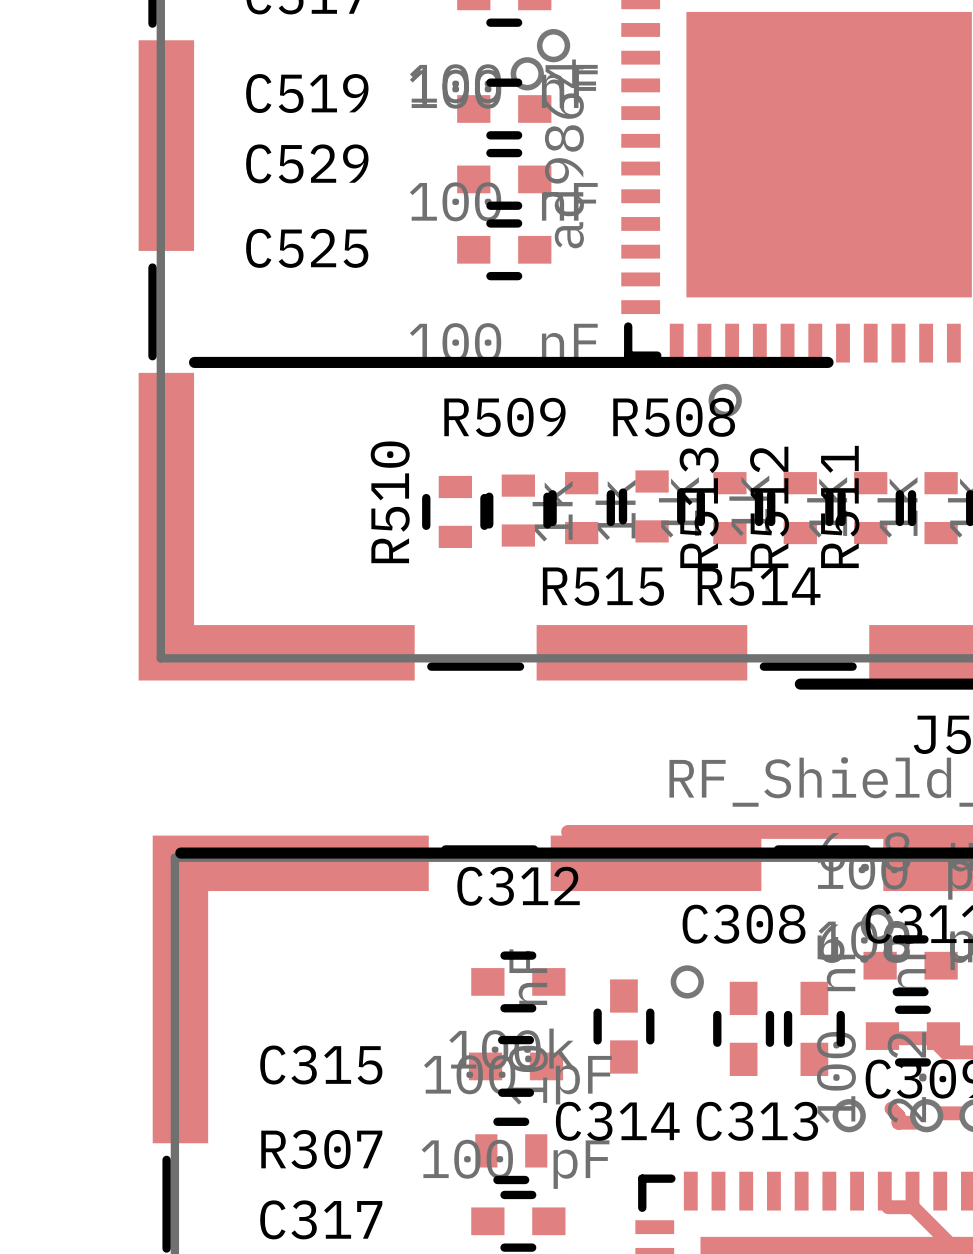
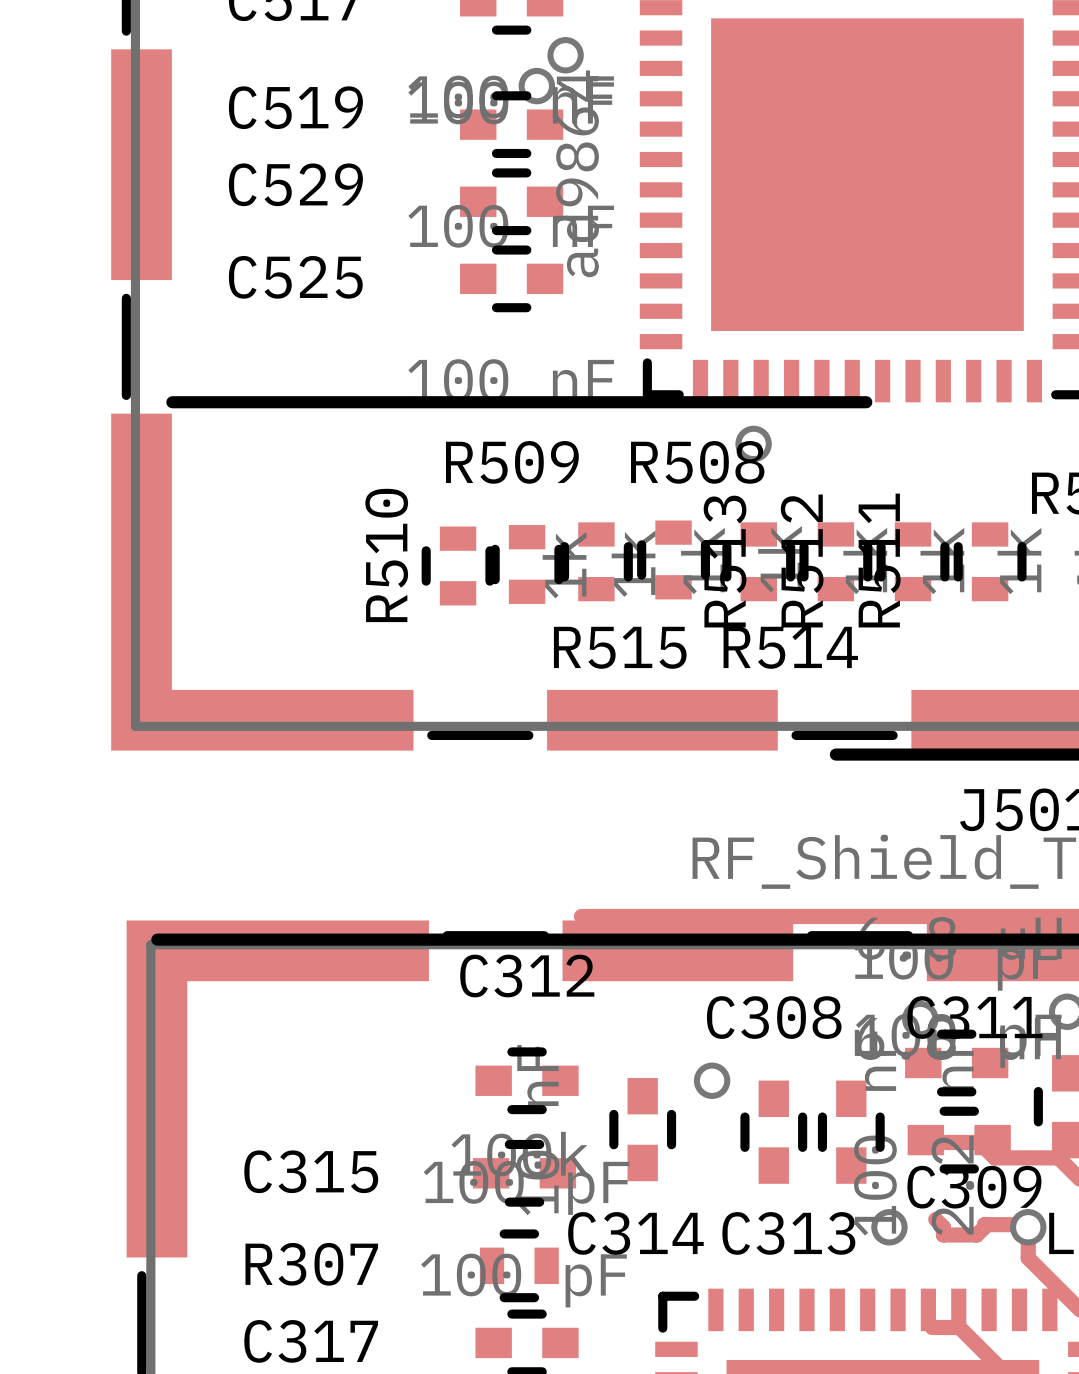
via: (926, 1115) -> none

